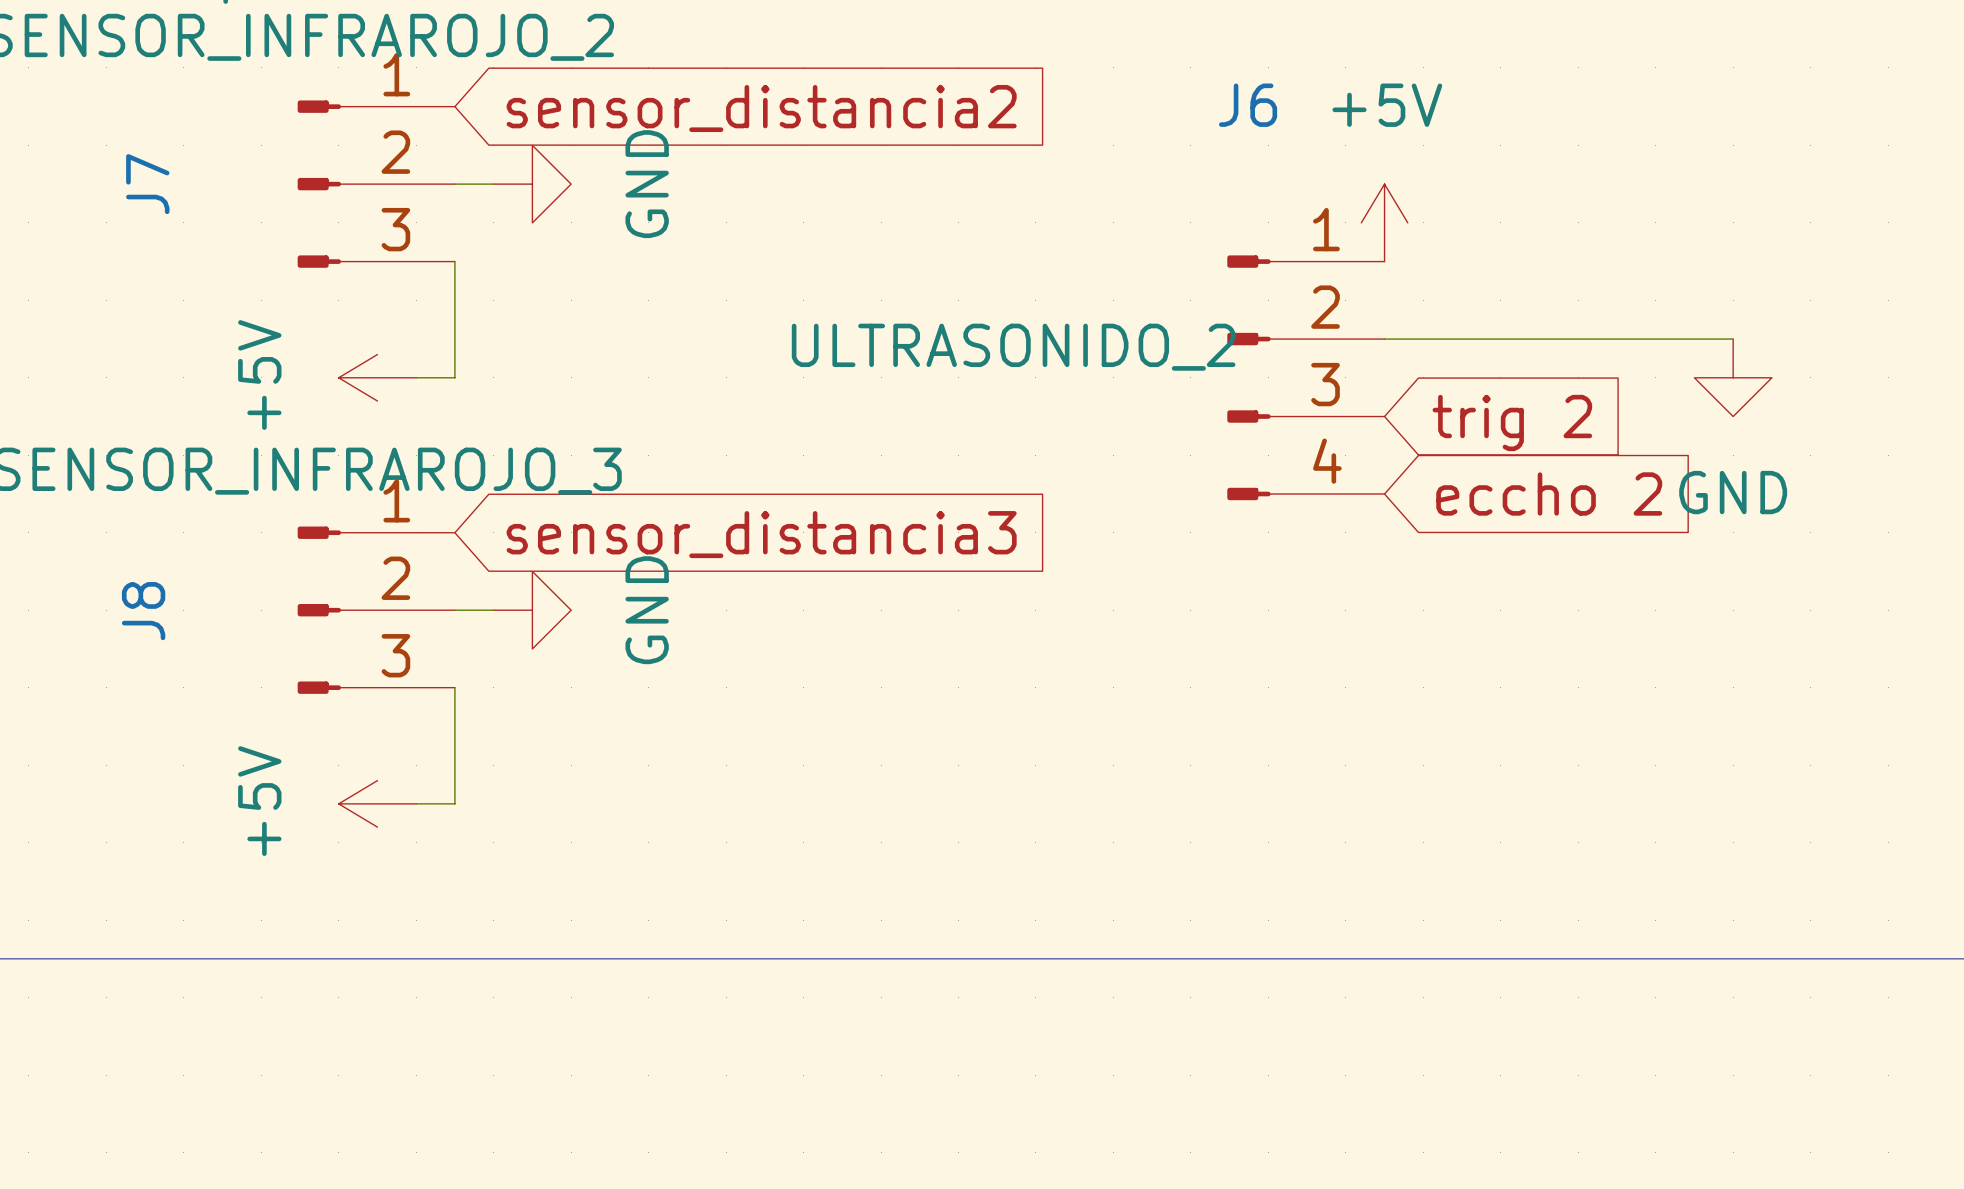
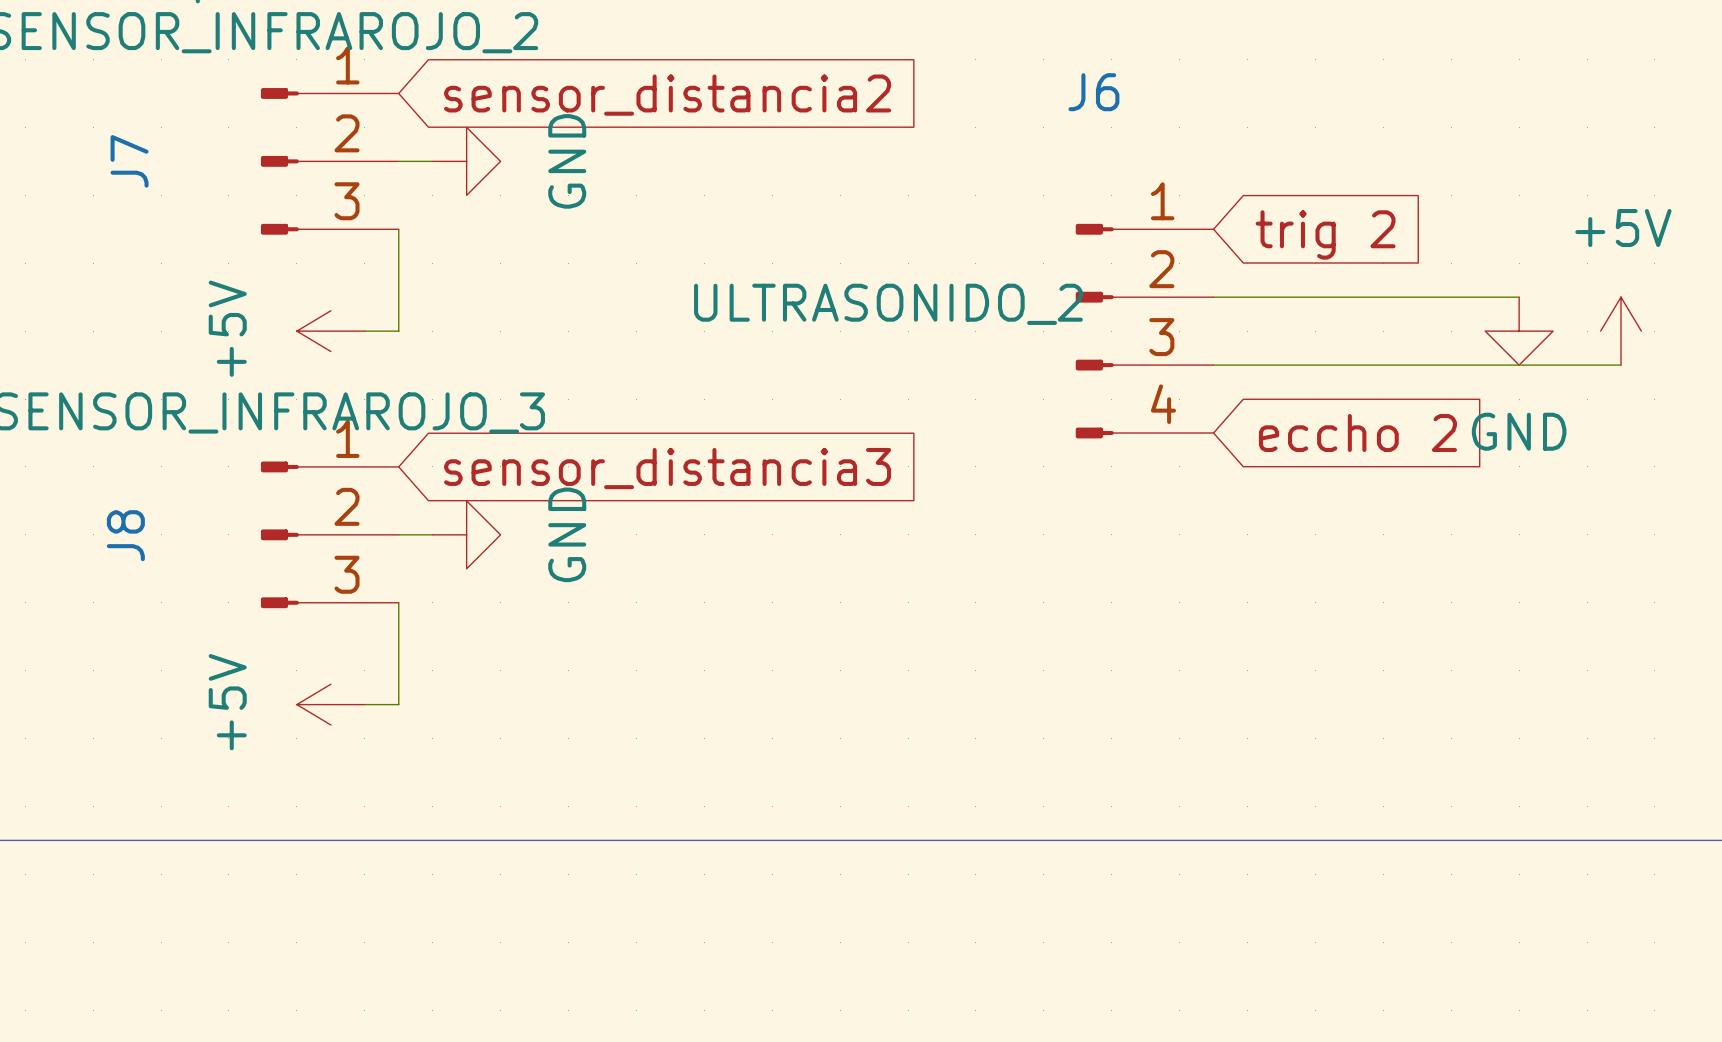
power symbol position: +5V (1384, 222) -> +5V (1620, 331)
wire: none -> (1213, 365) (1620, 365)
global label position: trig 2 (1512, 422) -> trig 2 (1325, 234)

